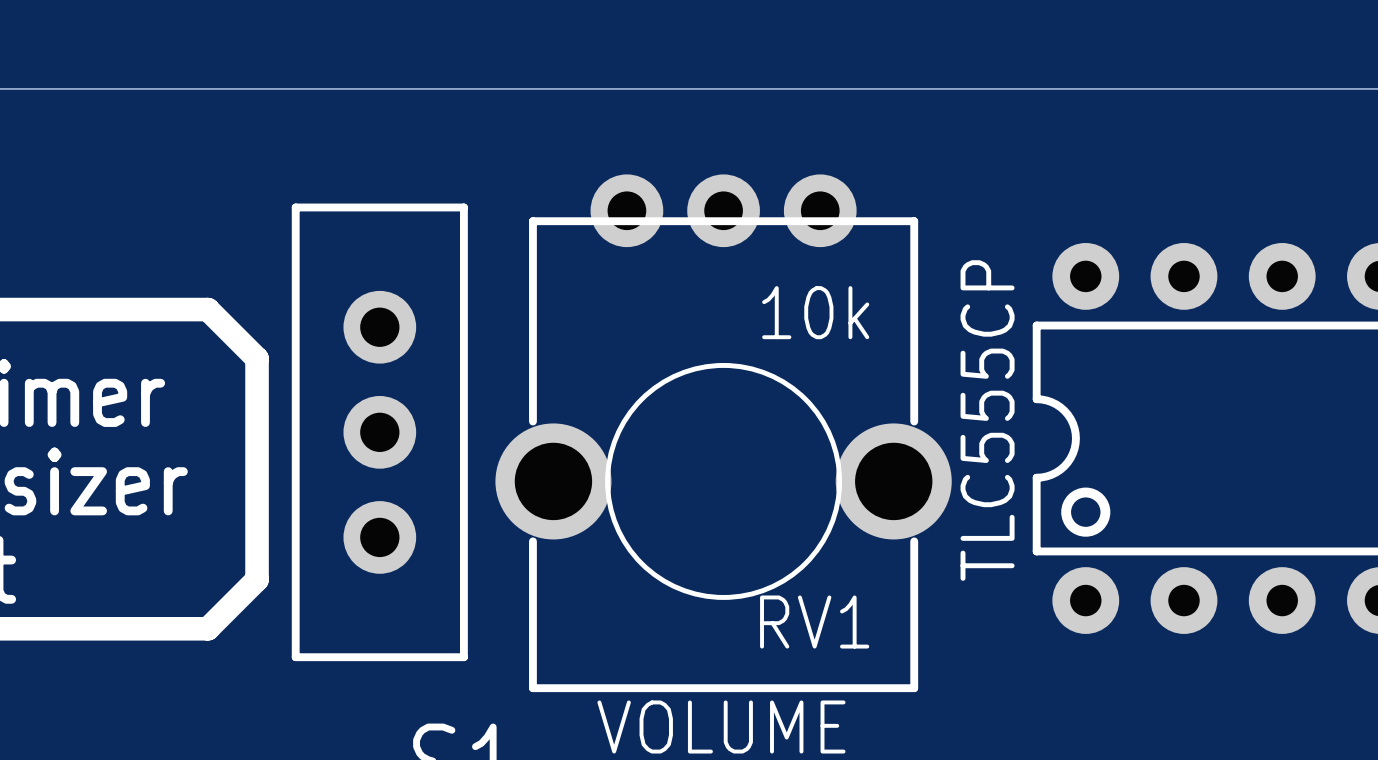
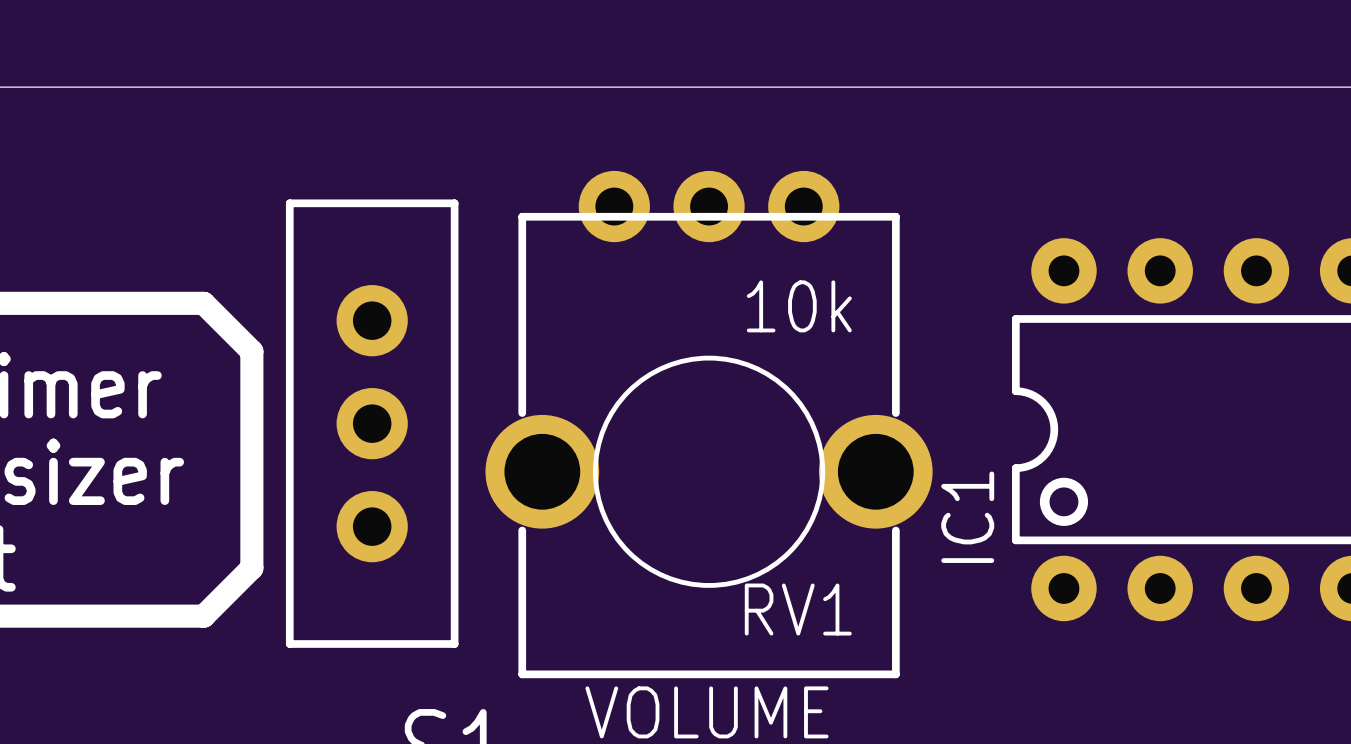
TLC555CP name: TLC555CP (987, 420) -> IC1 (967, 517)

